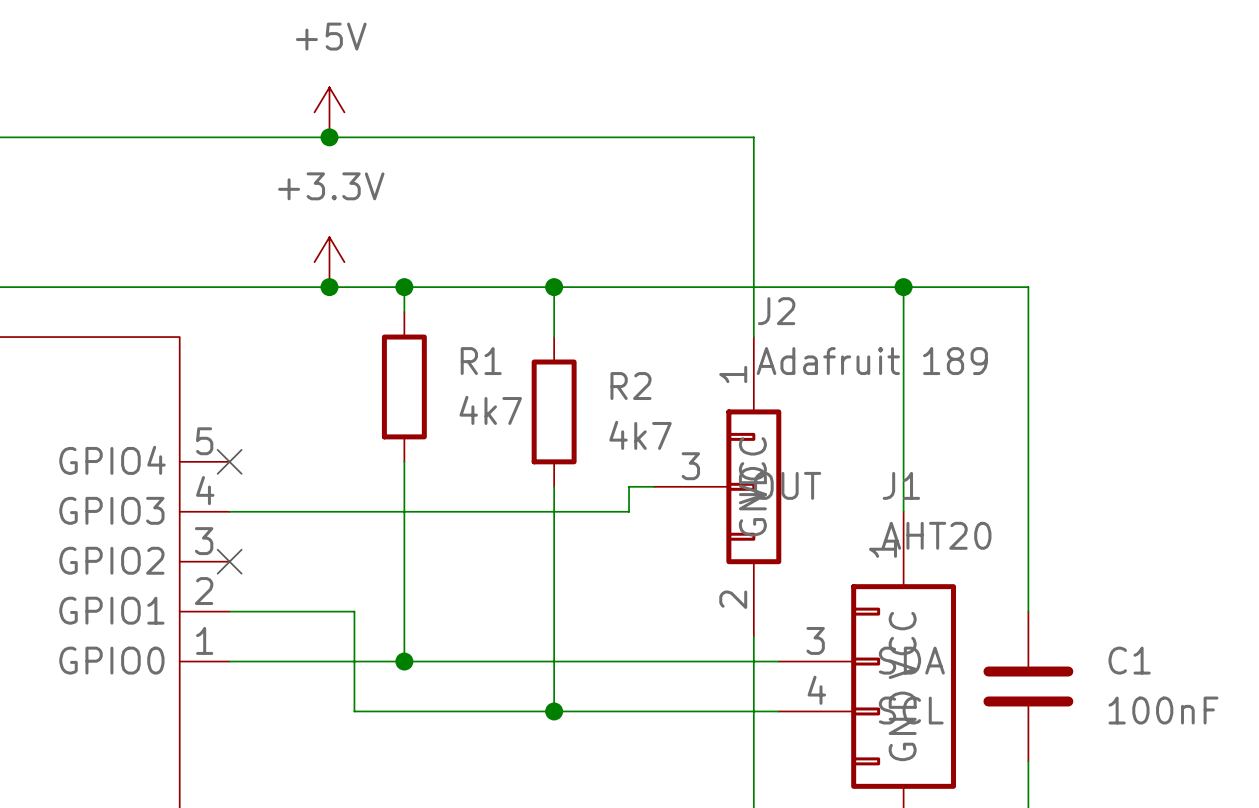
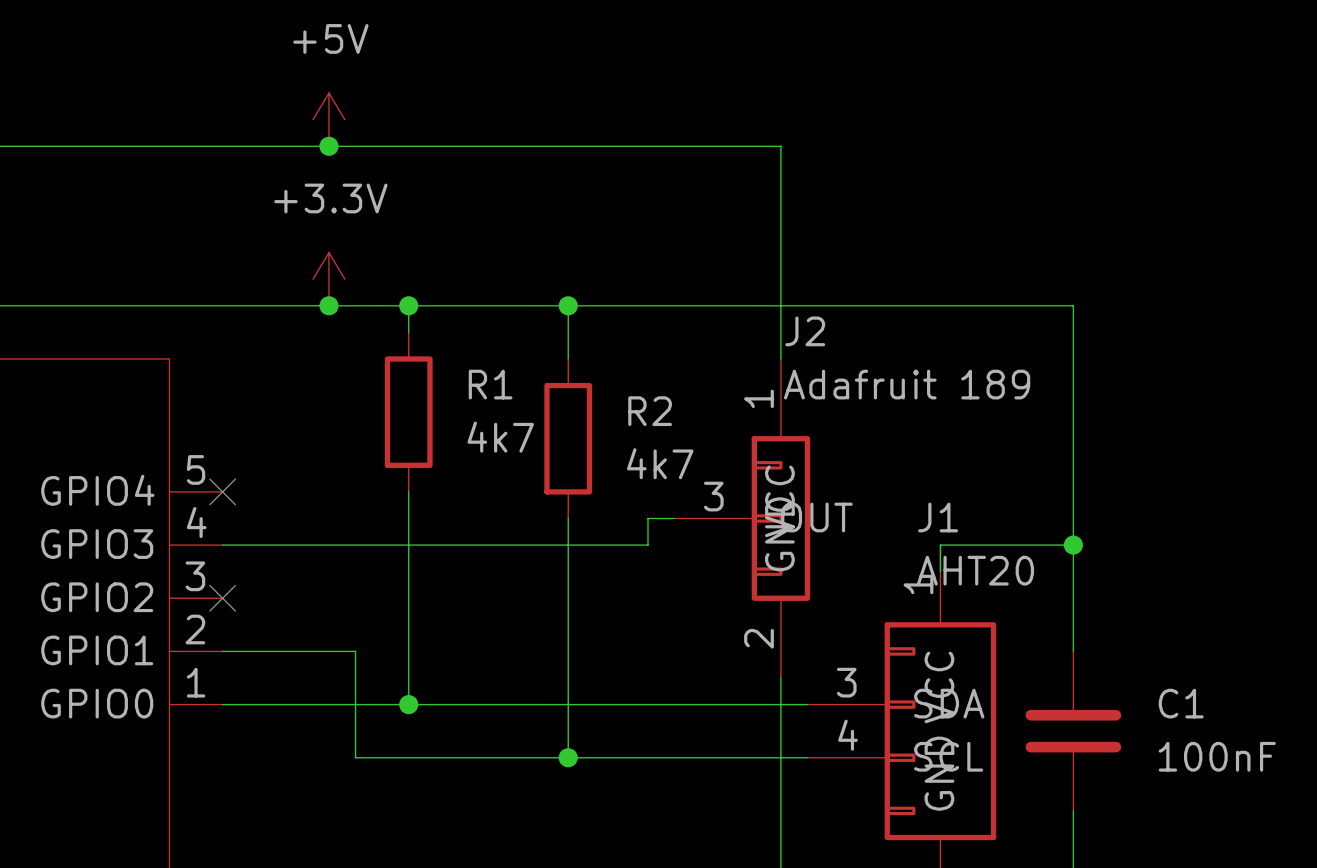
wire: (903, 287) (903, 511) -> none
junction: (903, 287) -> none
wire: none -> (1073, 545) (940, 545) (940, 571)
junction: none -> (1073, 545)

